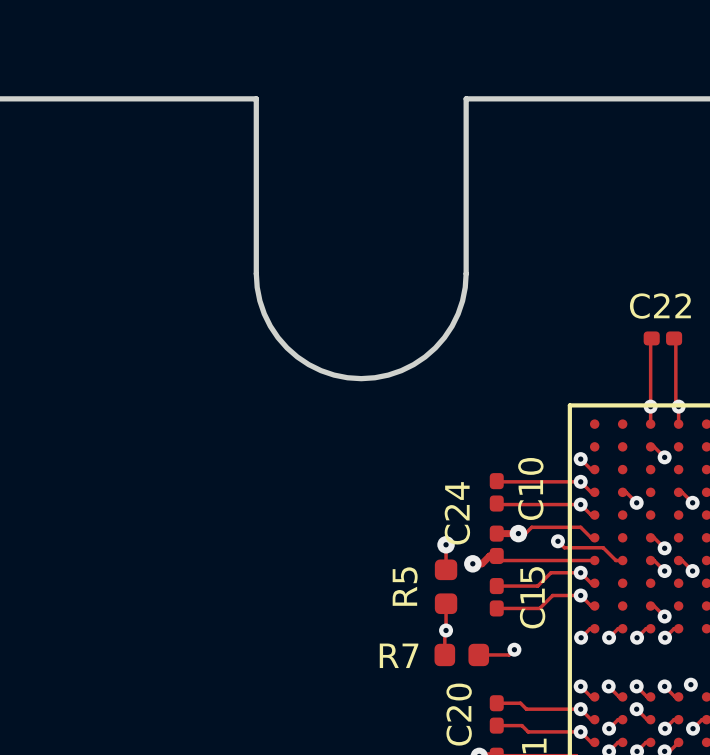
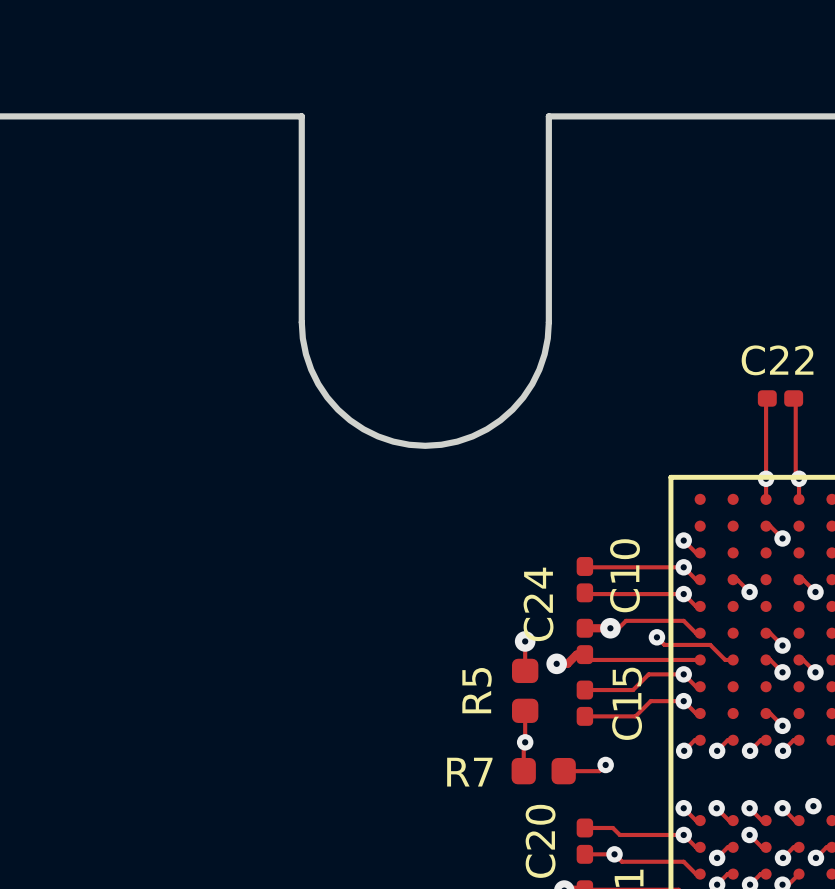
via: none -> (614, 854)
via: (580, 731) -> none

